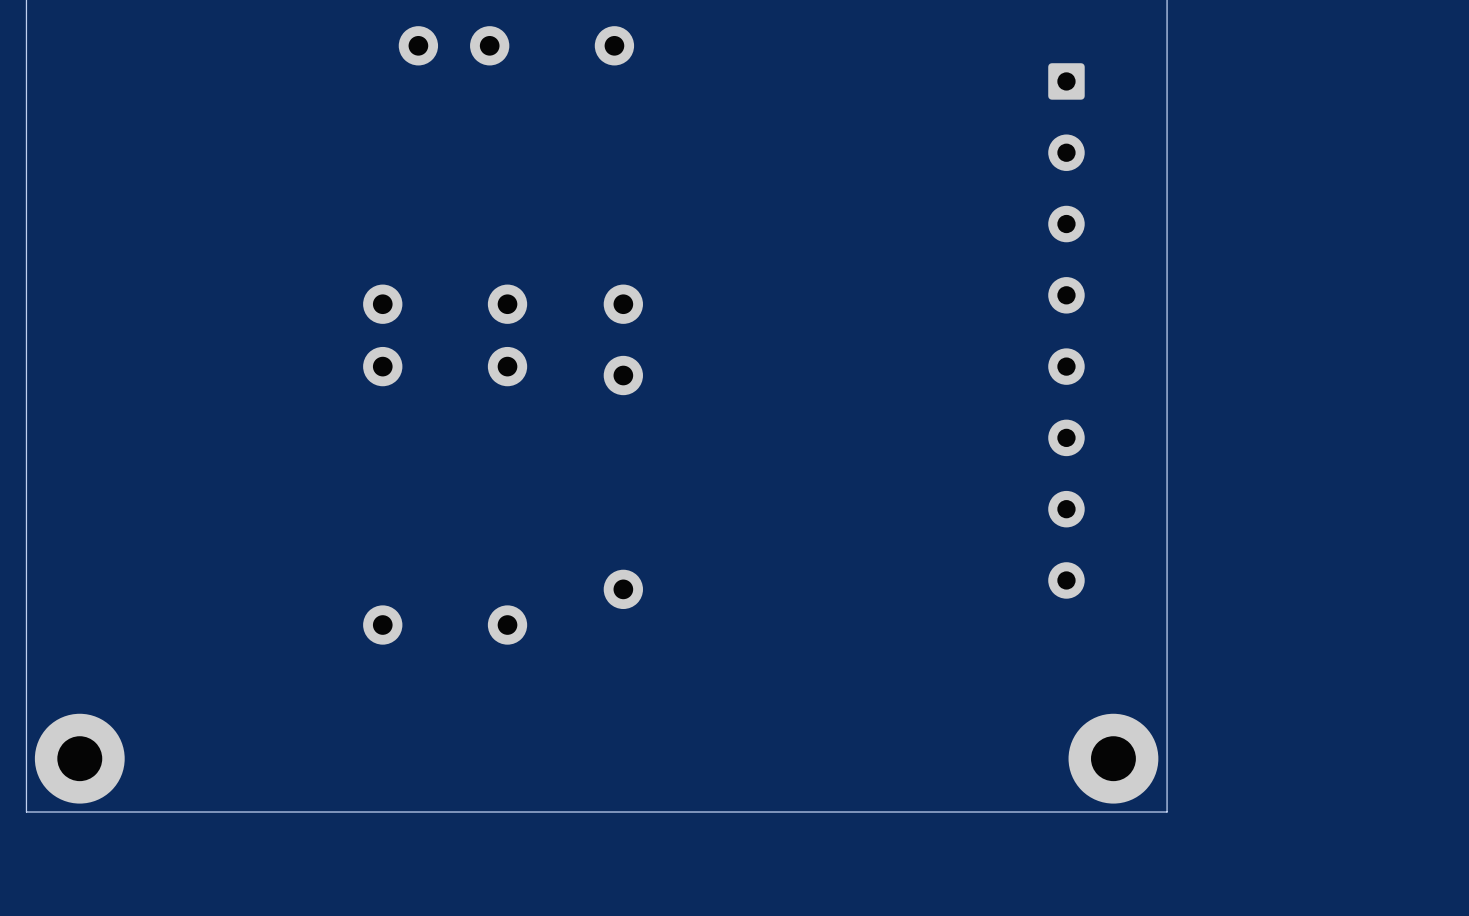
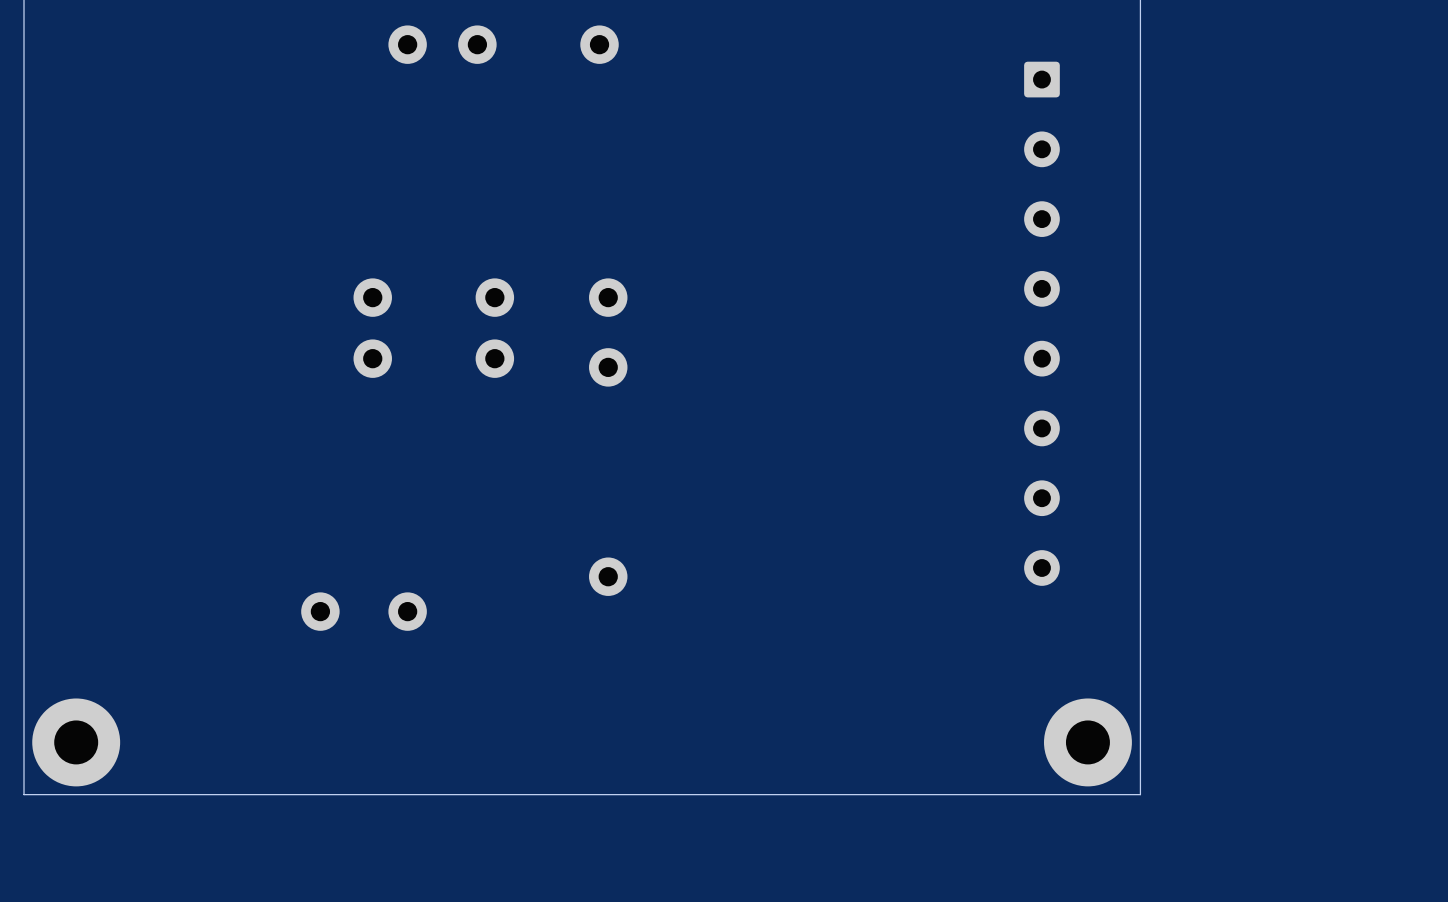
part: none -> (320, 611)
part: (382, 625) -> none
part: none -> (407, 611)
part: (507, 625) -> none

